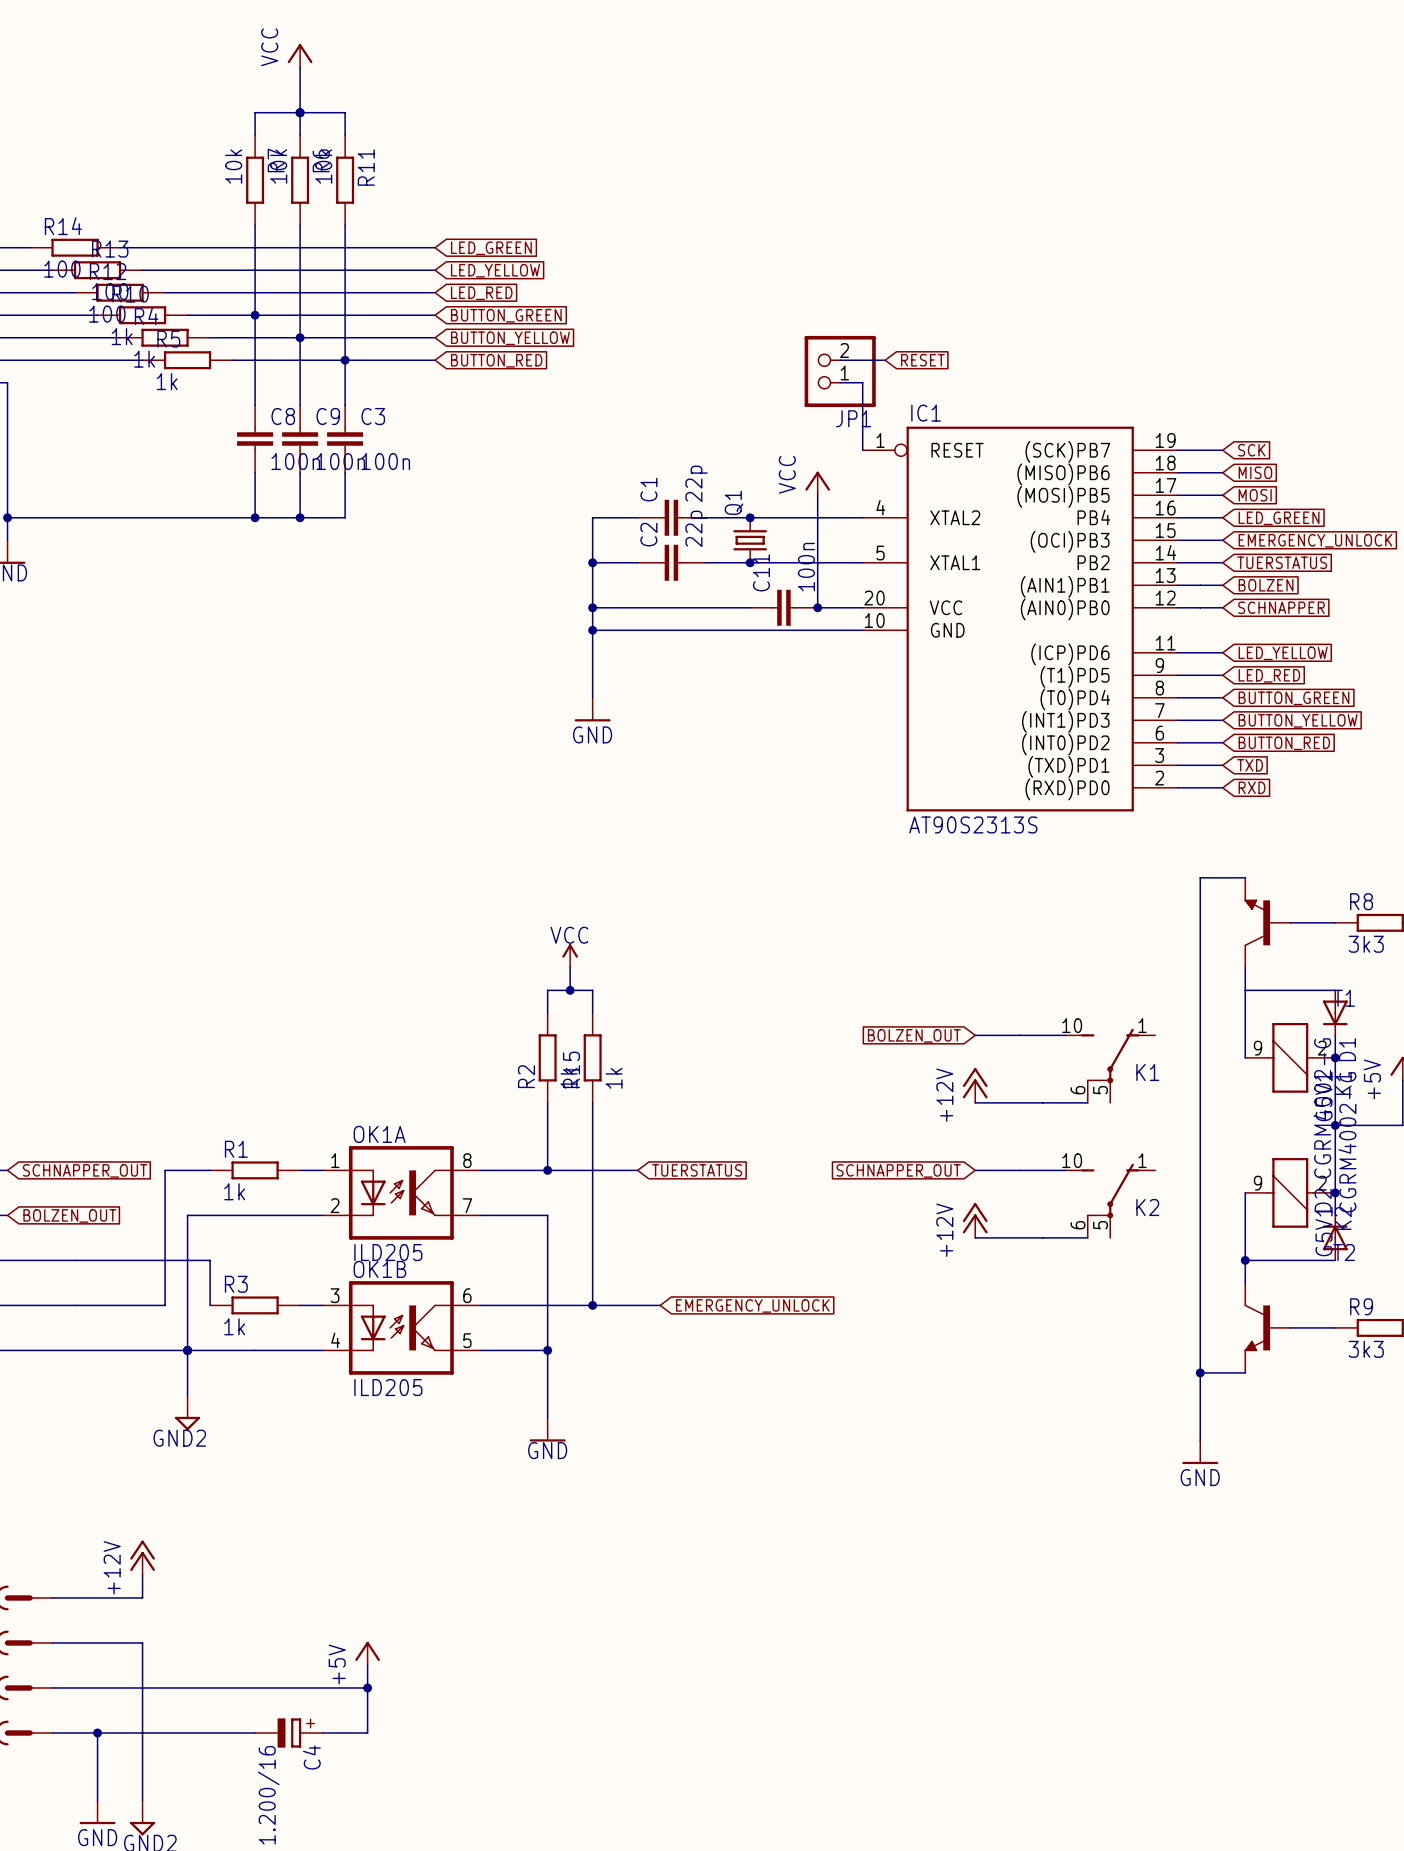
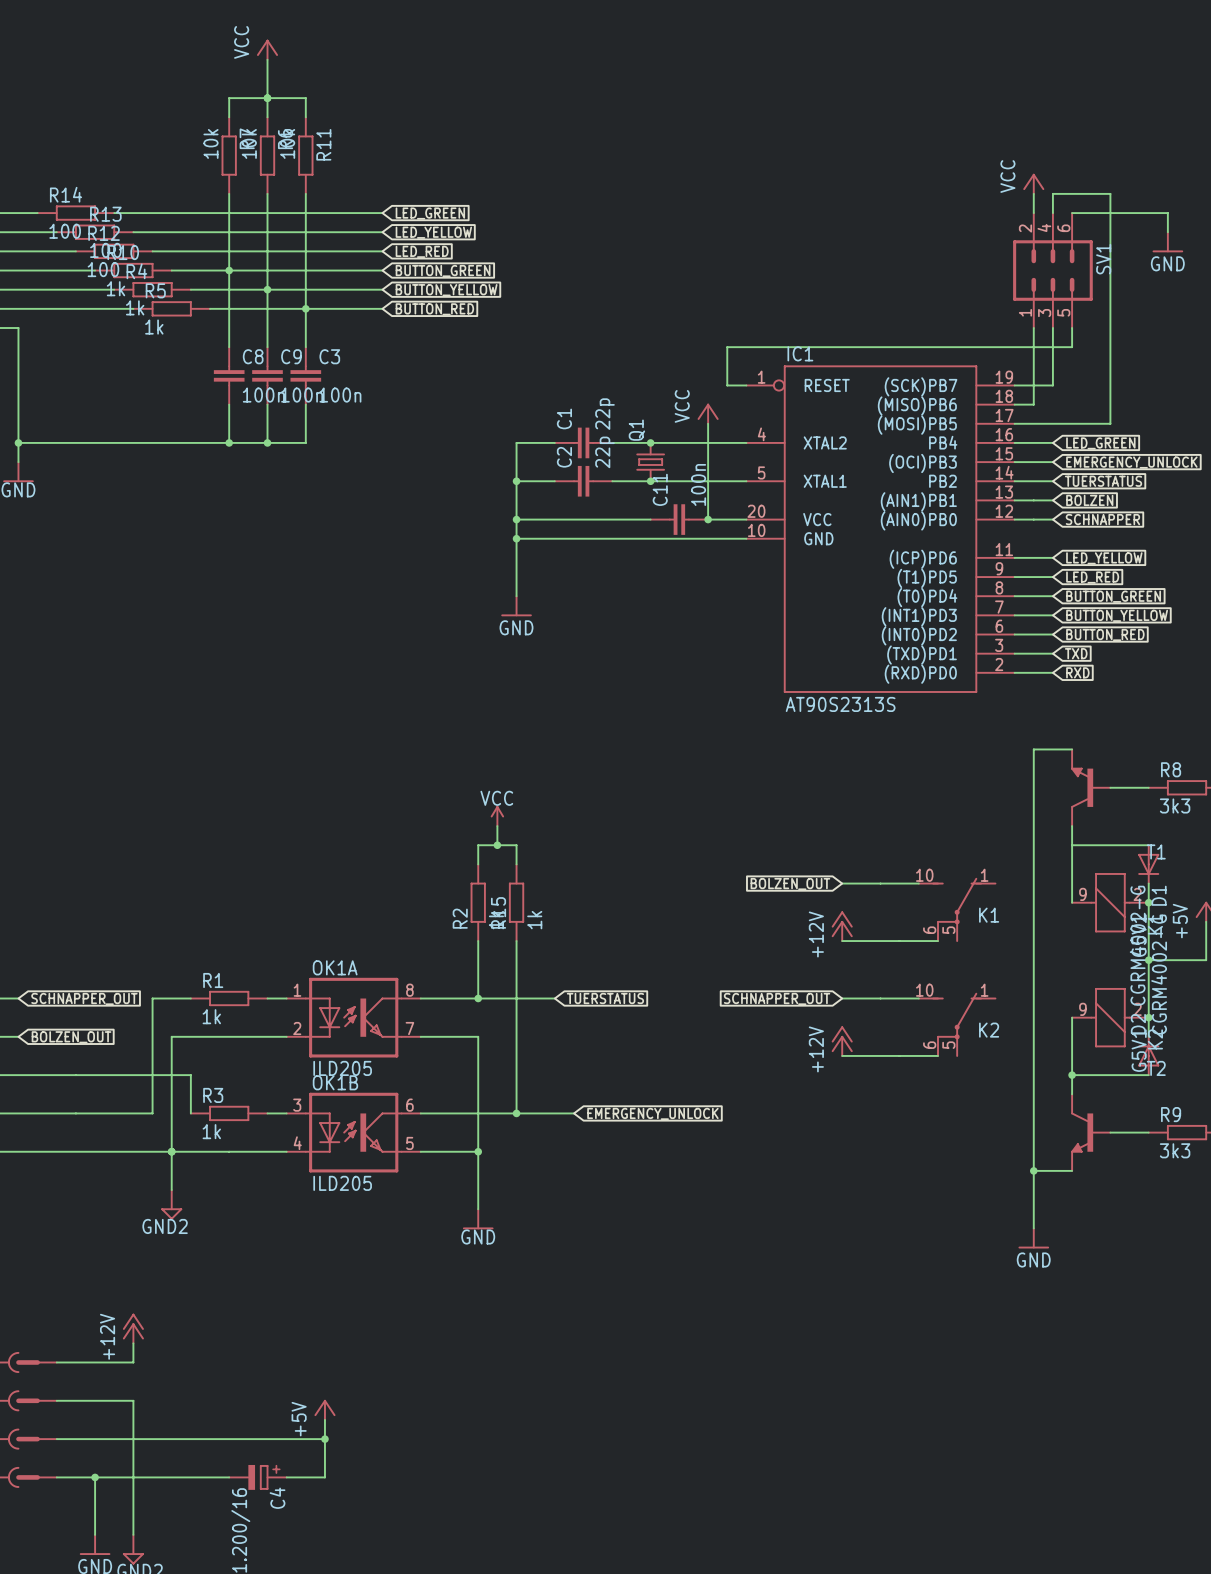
power symbol: none -> VCC (1033, 183)
wire: none -> (1033, 193) (1033, 213)
wire: none -> (1052, 213) (1052, 193) (1110, 193) (1110, 423) (1052, 423)
wire: none -> (1072, 213) (1167, 213) (1167, 232)
power symbol: none -> GND (1167, 242)
SV1: none -> (1052, 270)
wire: (840, 360) (885, 360) -> none
global label: RESET (922, 360) -> none
JP1: (840, 371) -> none
wire: (840, 382) (862, 382) (862, 450) -> (1072, 328) (1072, 347) (727, 347) (727, 385) (746, 385)
wire: none -> (1052, 328) (1052, 385)
global label: SCK (1251, 450) -> none
wire: (1200, 472) (1222, 472) -> (1033, 404) (1033, 328)
global label: MISO (1255, 472) -> none
global label: MOSI (1255, 495) -> none

